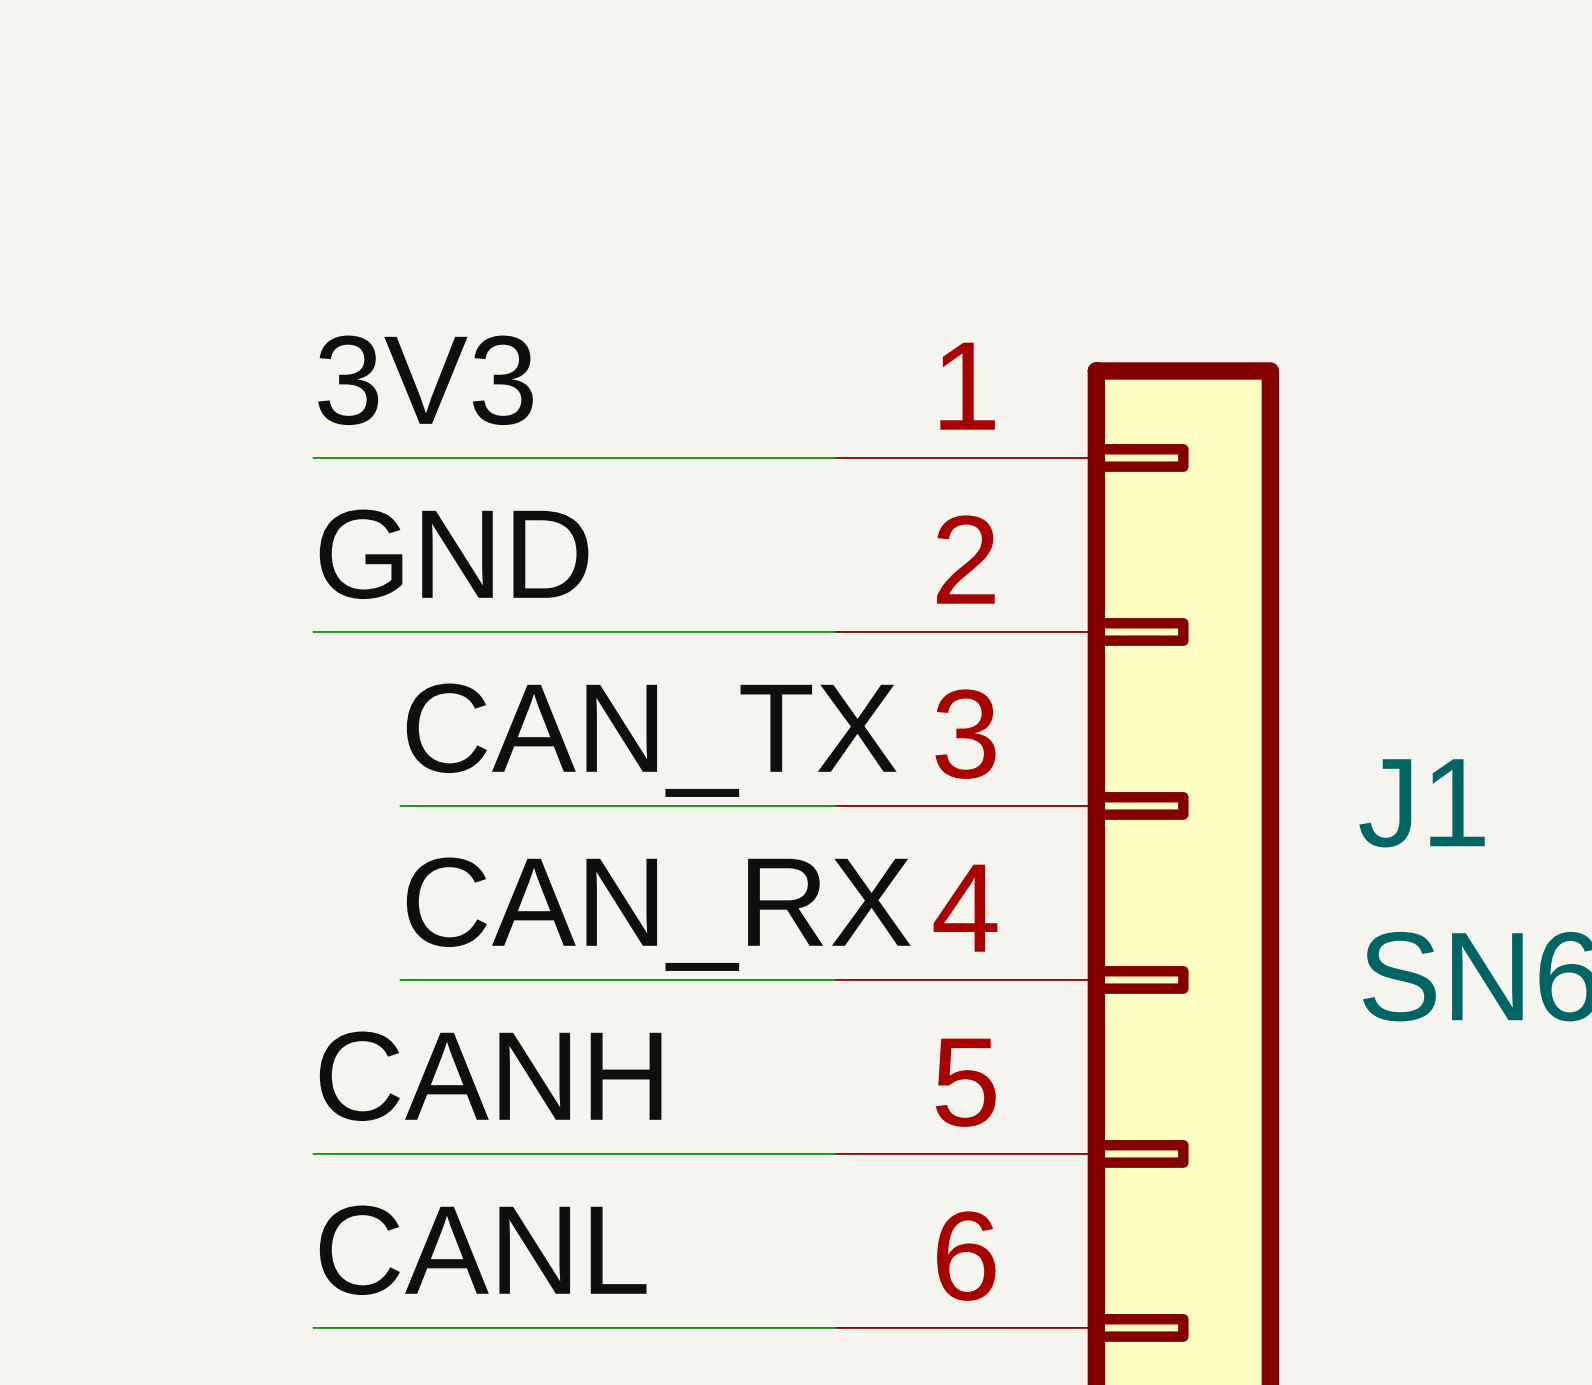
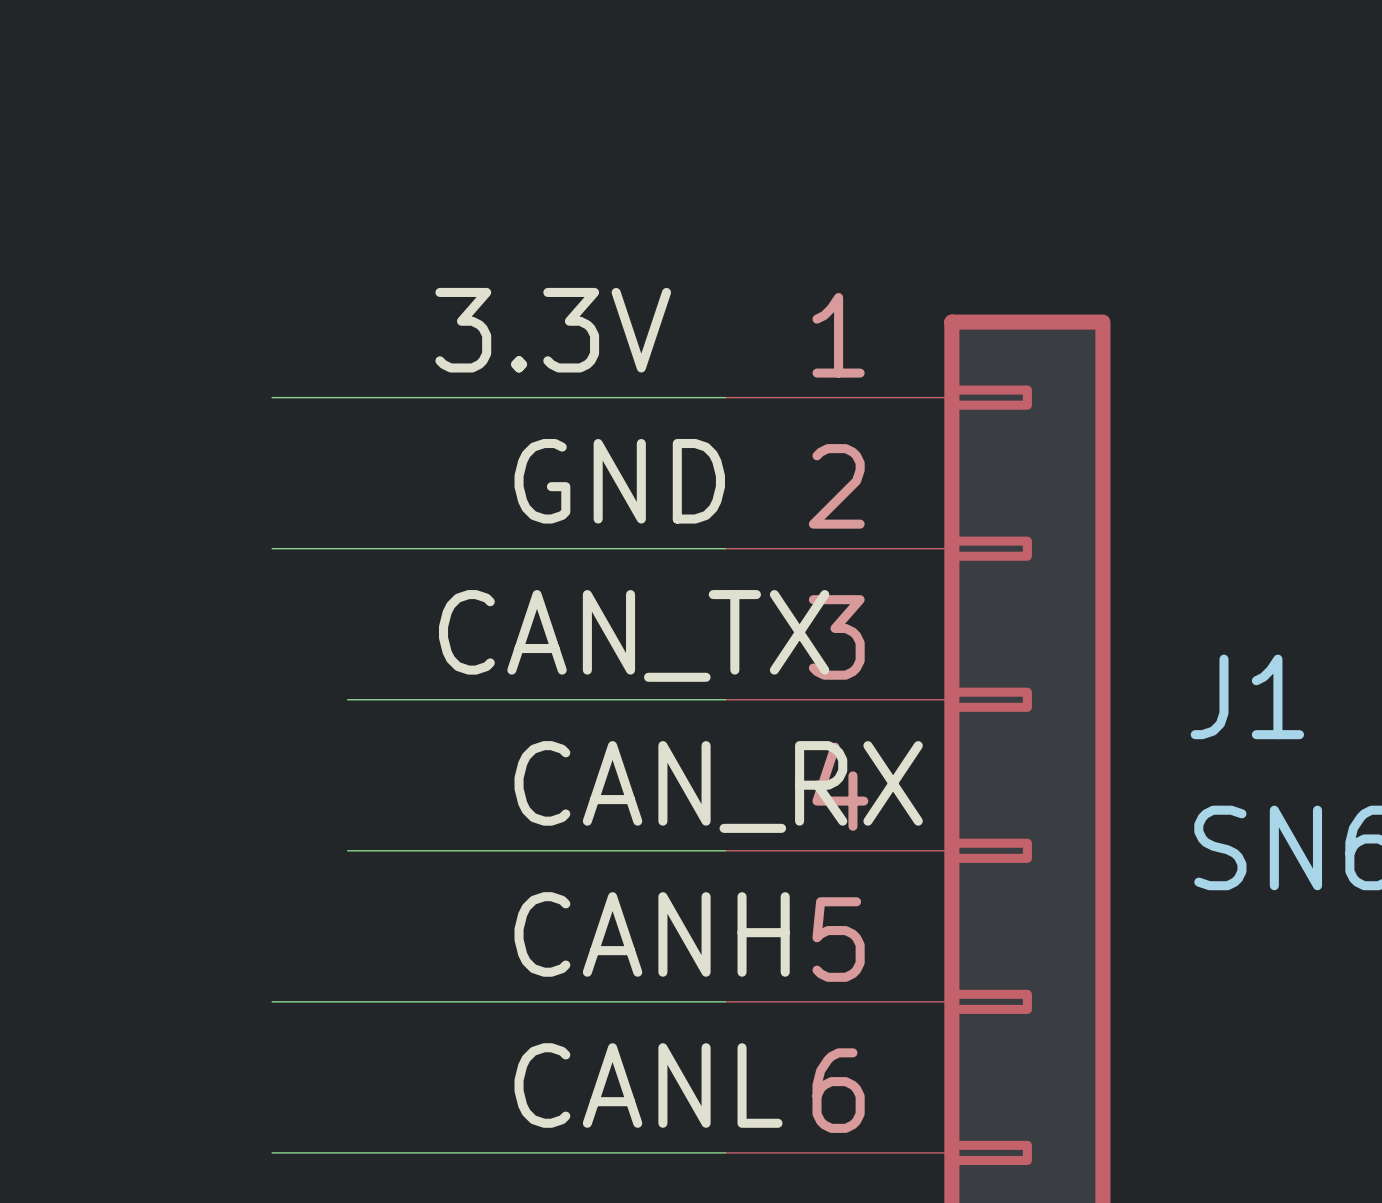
label: 3V3 (425, 380) -> none
label: none -> 3.3V (553, 330)
label position: GND (454, 554) -> GND (619, 481)
label position: CAN_TX (651, 740) -> CAN_TX (634, 635)
label position: CAN_RX (658, 914) -> CAN_RX (718, 786)
label position: CANH (490, 1076) -> CANH (652, 934)
label position: CANL (483, 1250) -> CANL (648, 1085)

